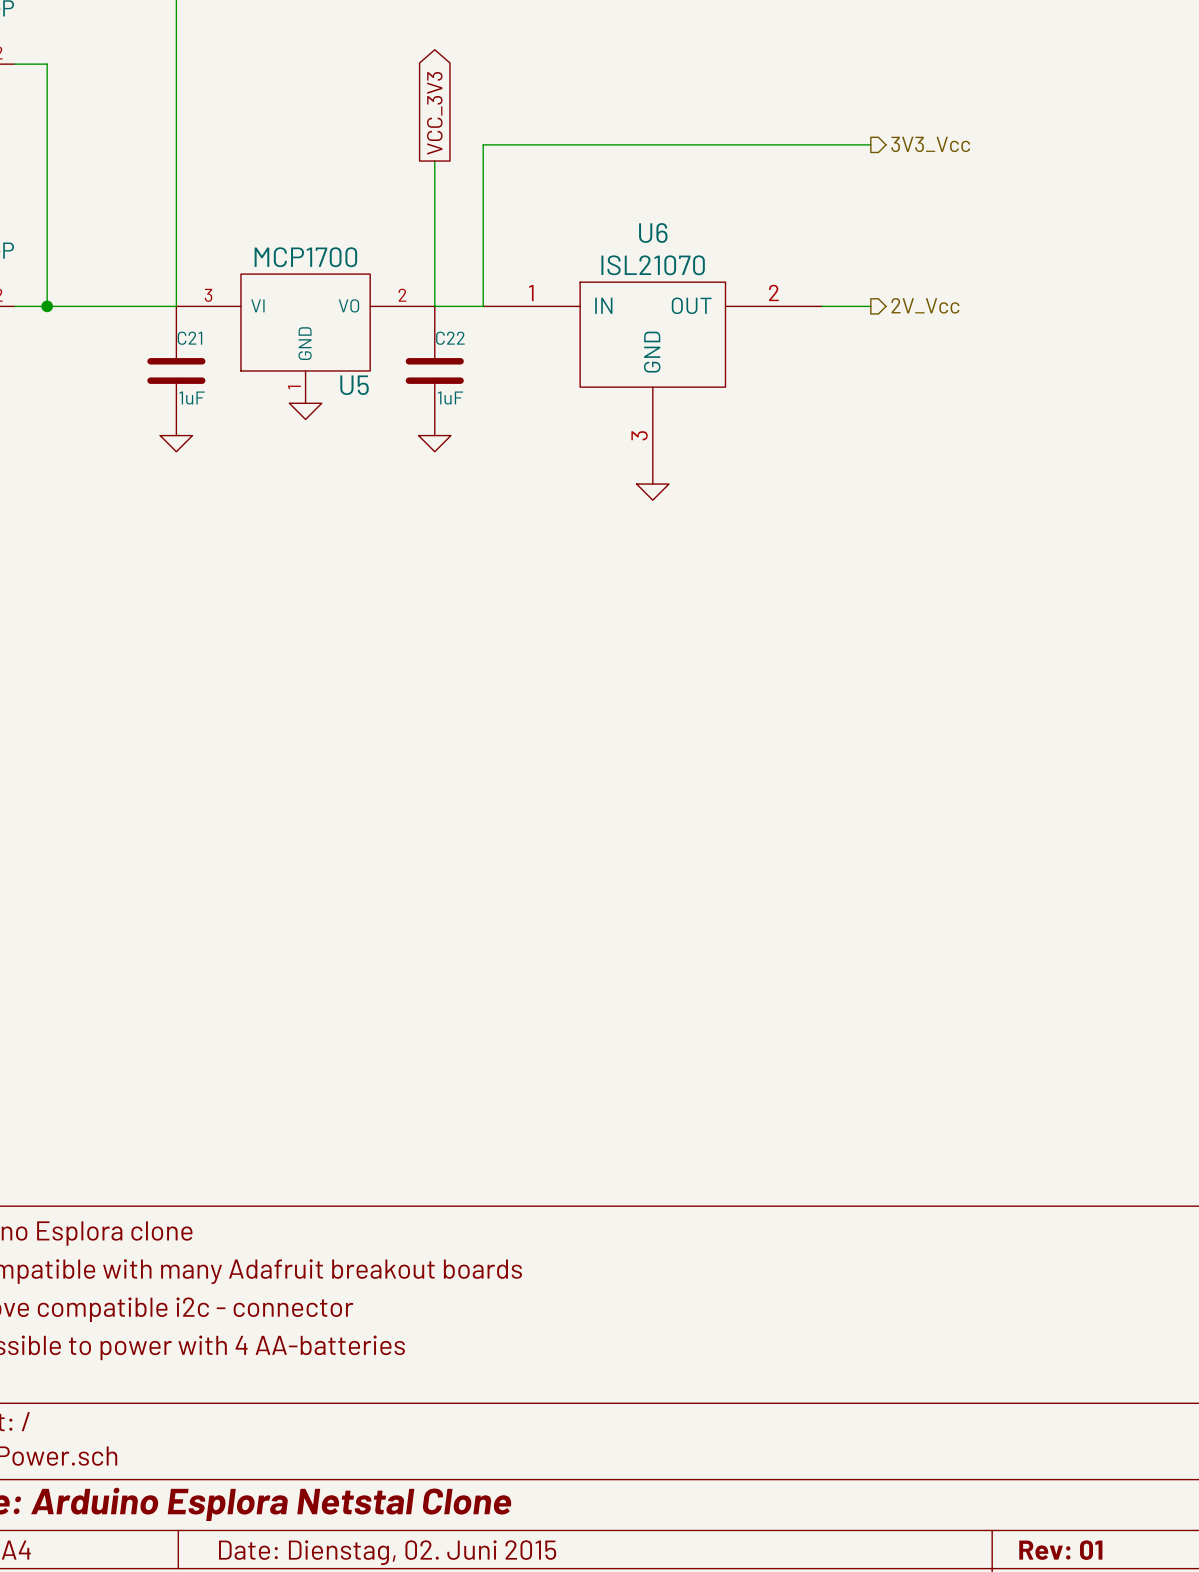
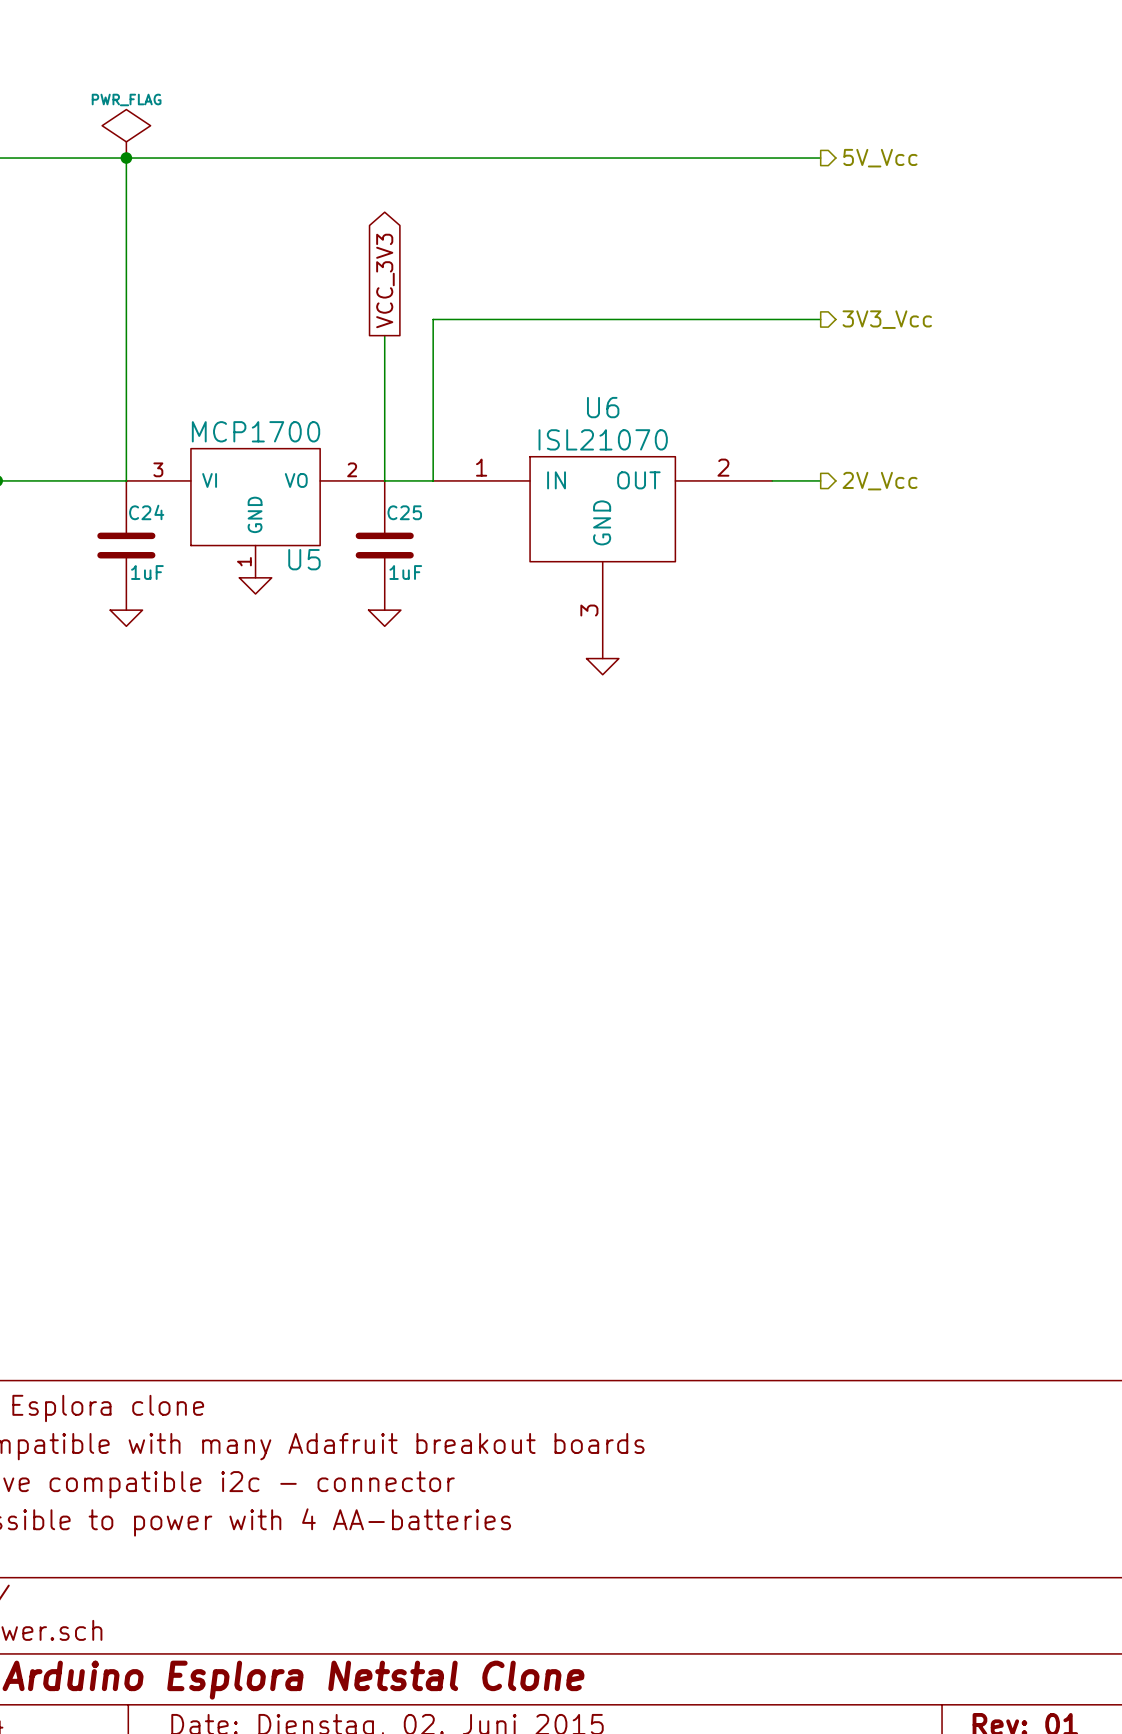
C21 name: C21 (189, 338) -> C24 (146, 512)
C22 name: C22 (450, 338) -> C25 (404, 512)

